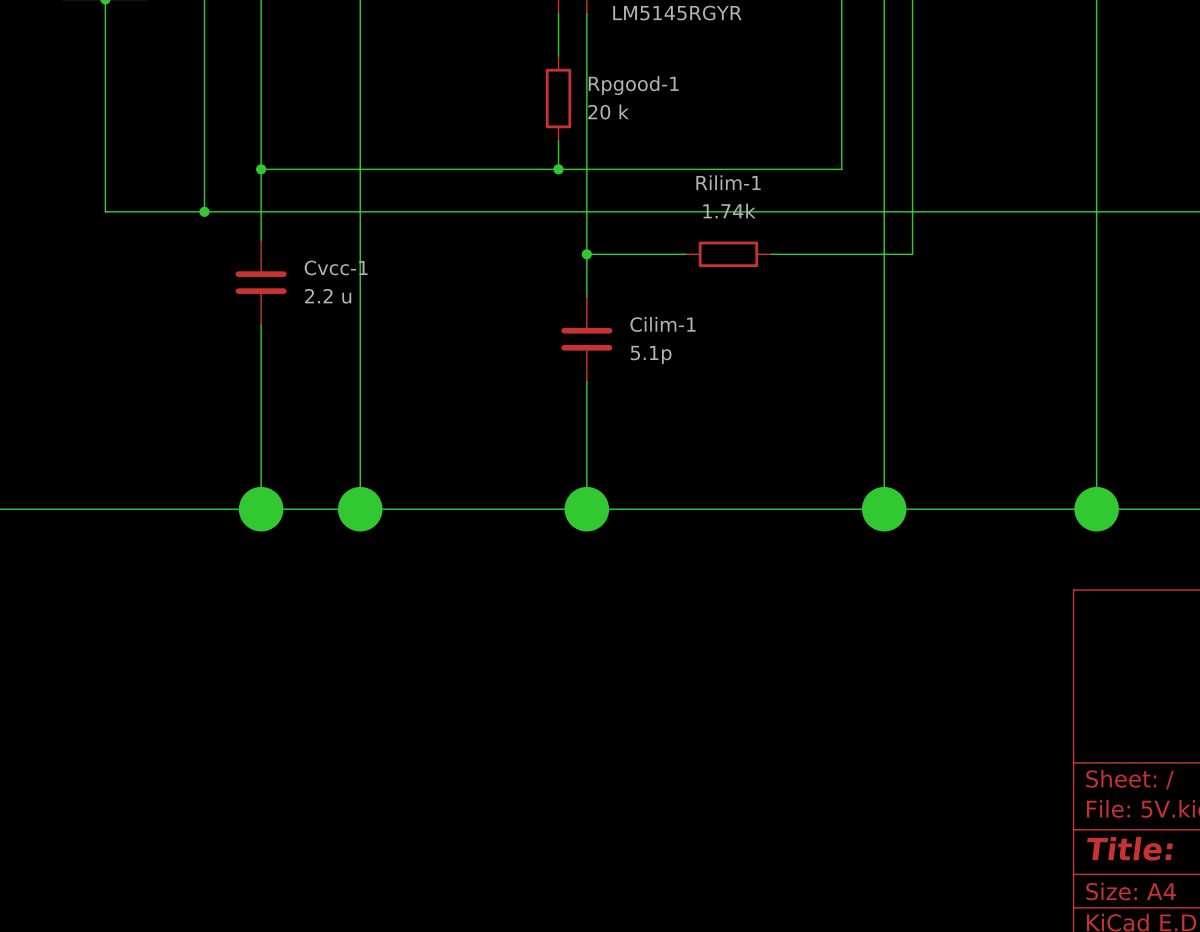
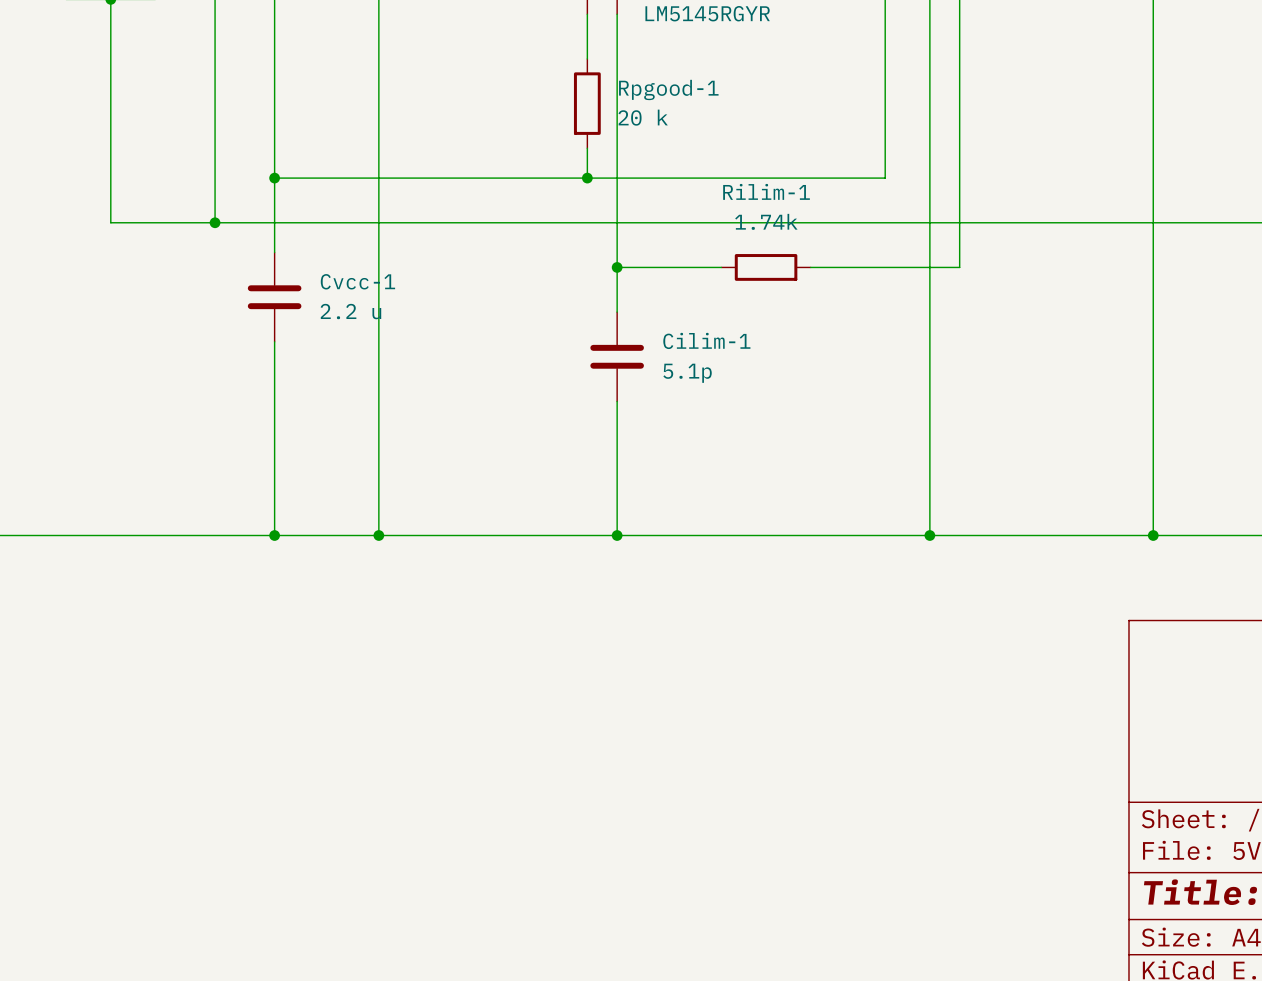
junction size: [238, 486, 284, 532] -> [269, 530, 280, 541]
junction size: [337, 486, 383, 532] -> [373, 530, 385, 541]
junction size: [564, 486, 610, 532] -> [611, 530, 623, 541]
junction size: [861, 486, 907, 532] -> [924, 530, 936, 541]
junction size: [1074, 486, 1119, 532] -> [1147, 530, 1159, 541]

